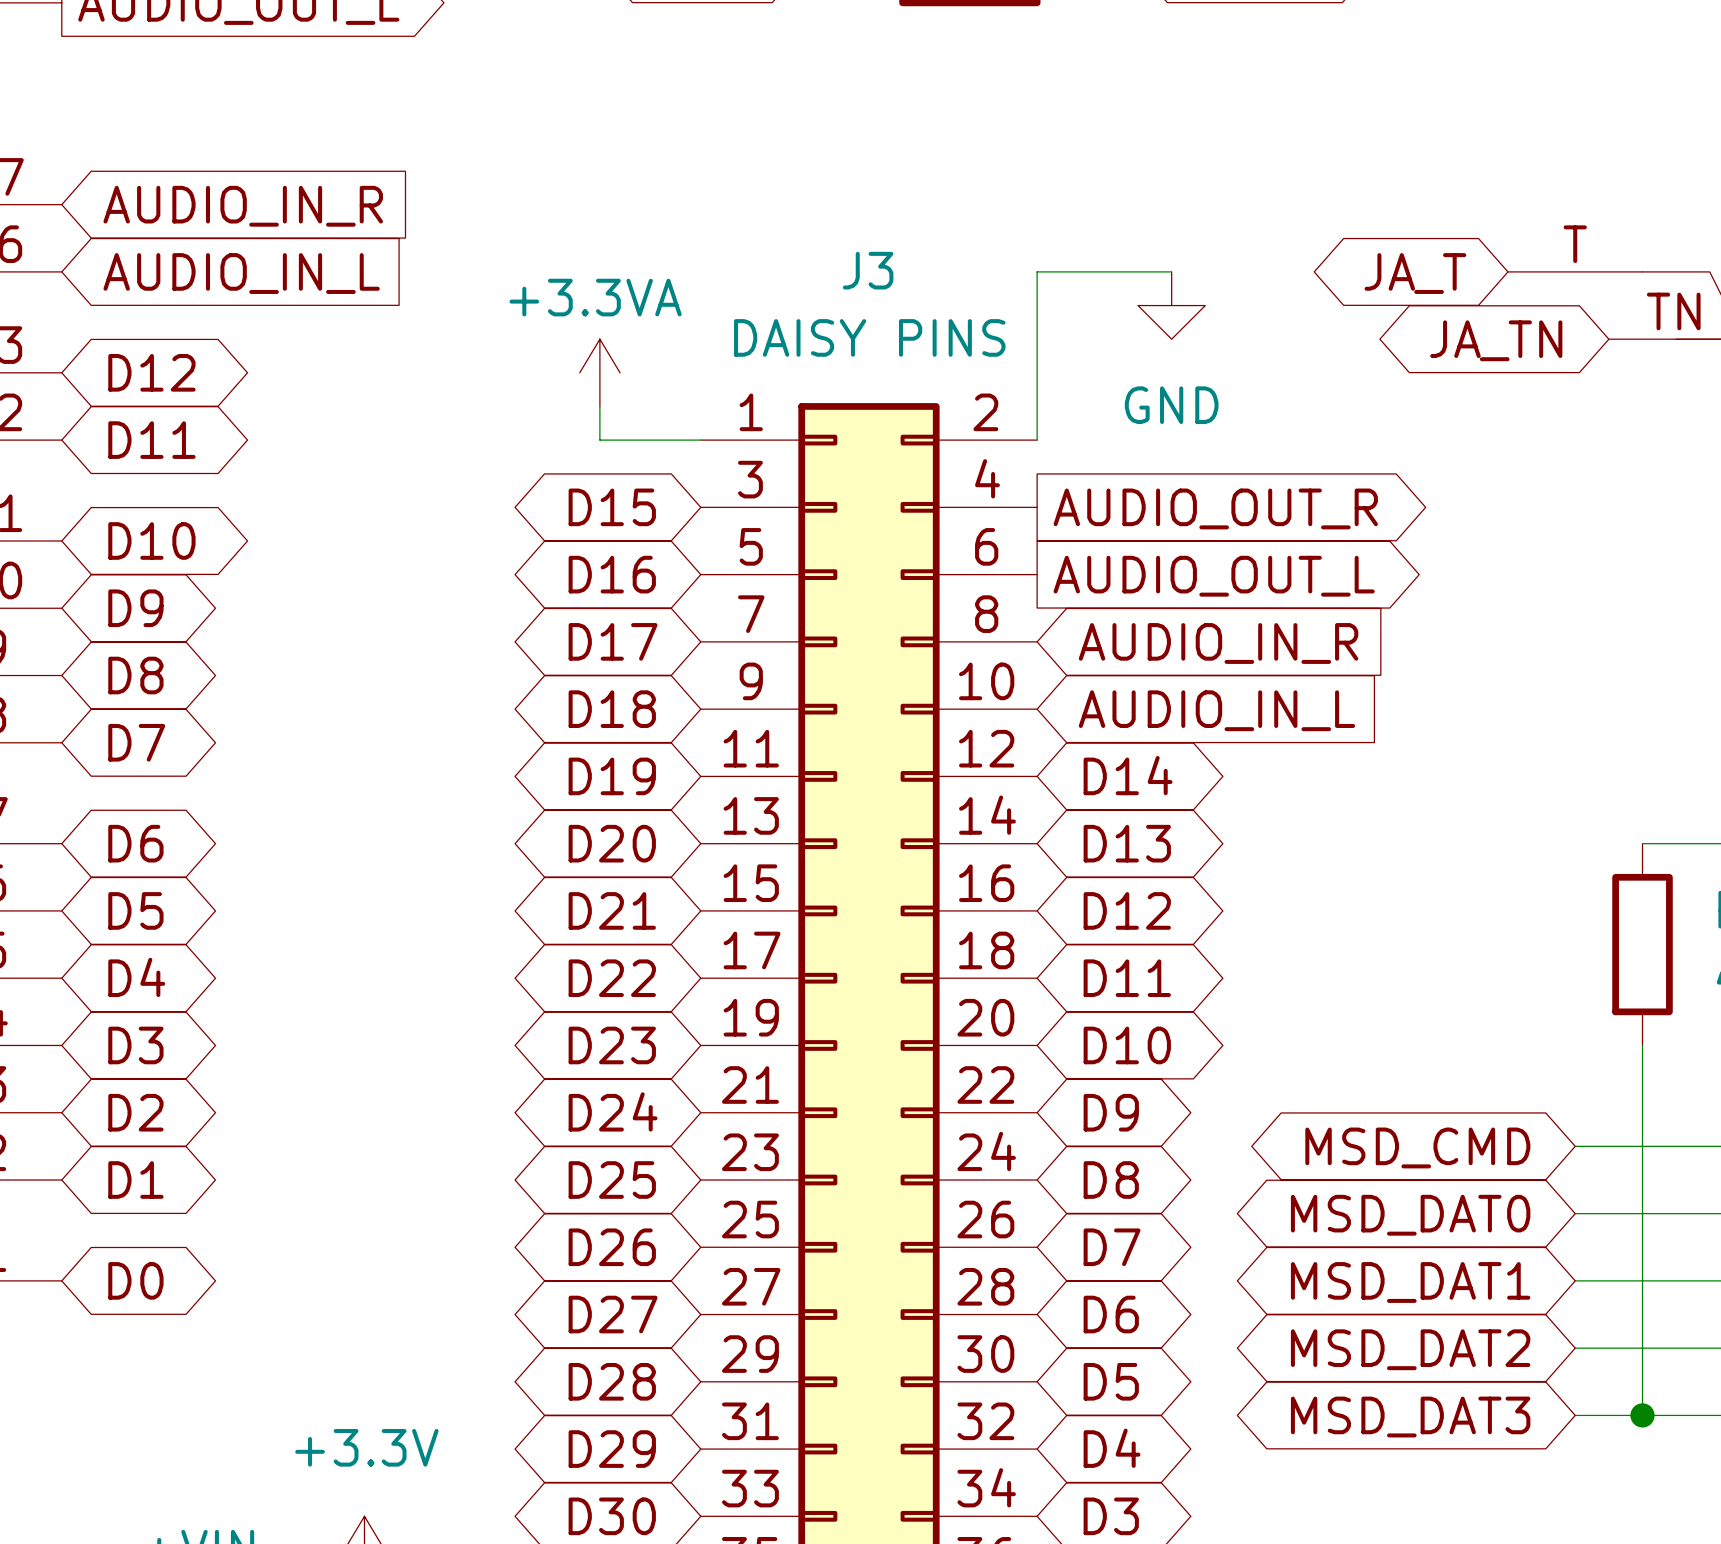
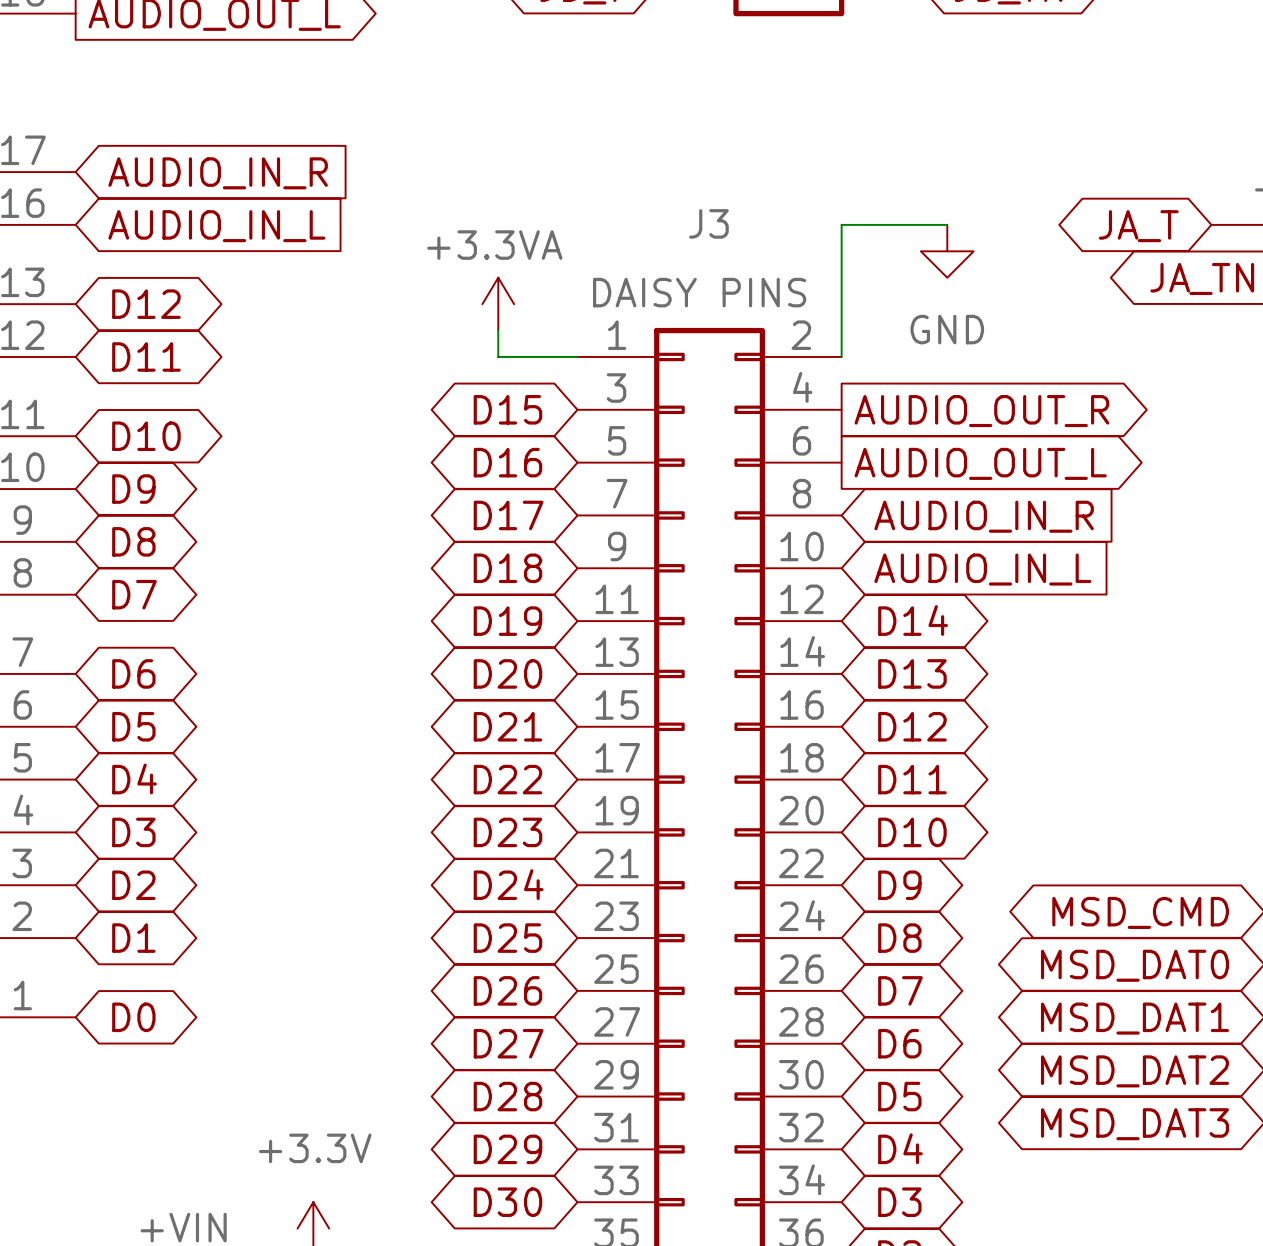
J3 value: DAISY PINS (869, 337) -> none
J3 text: none -> DAISY PINS (699, 292)

